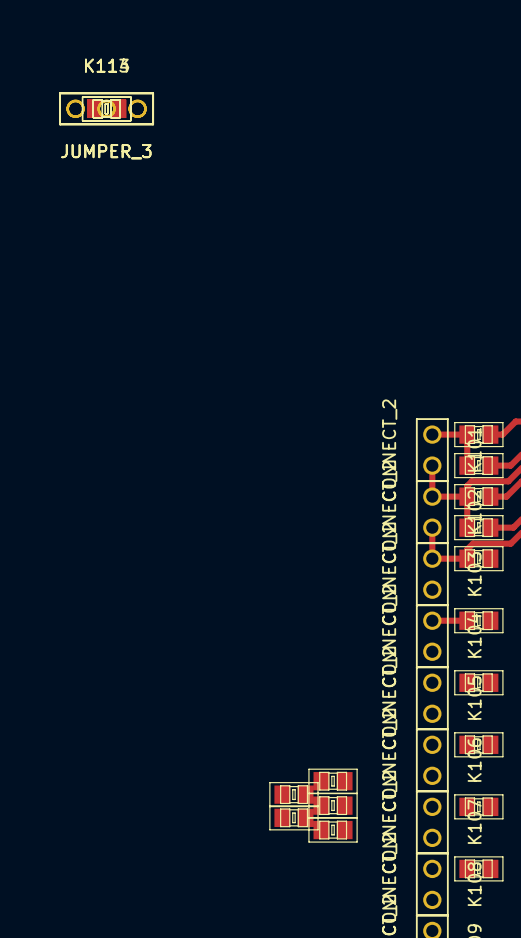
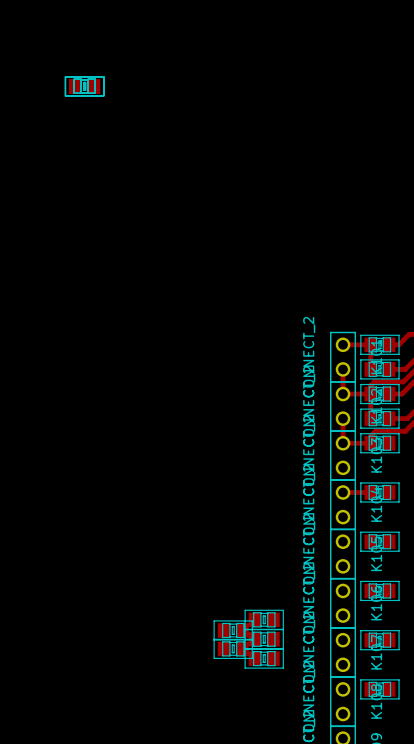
part: JUMPER_3 (106, 108) -> none
part: JUMPER_3 (106, 108) -> none

